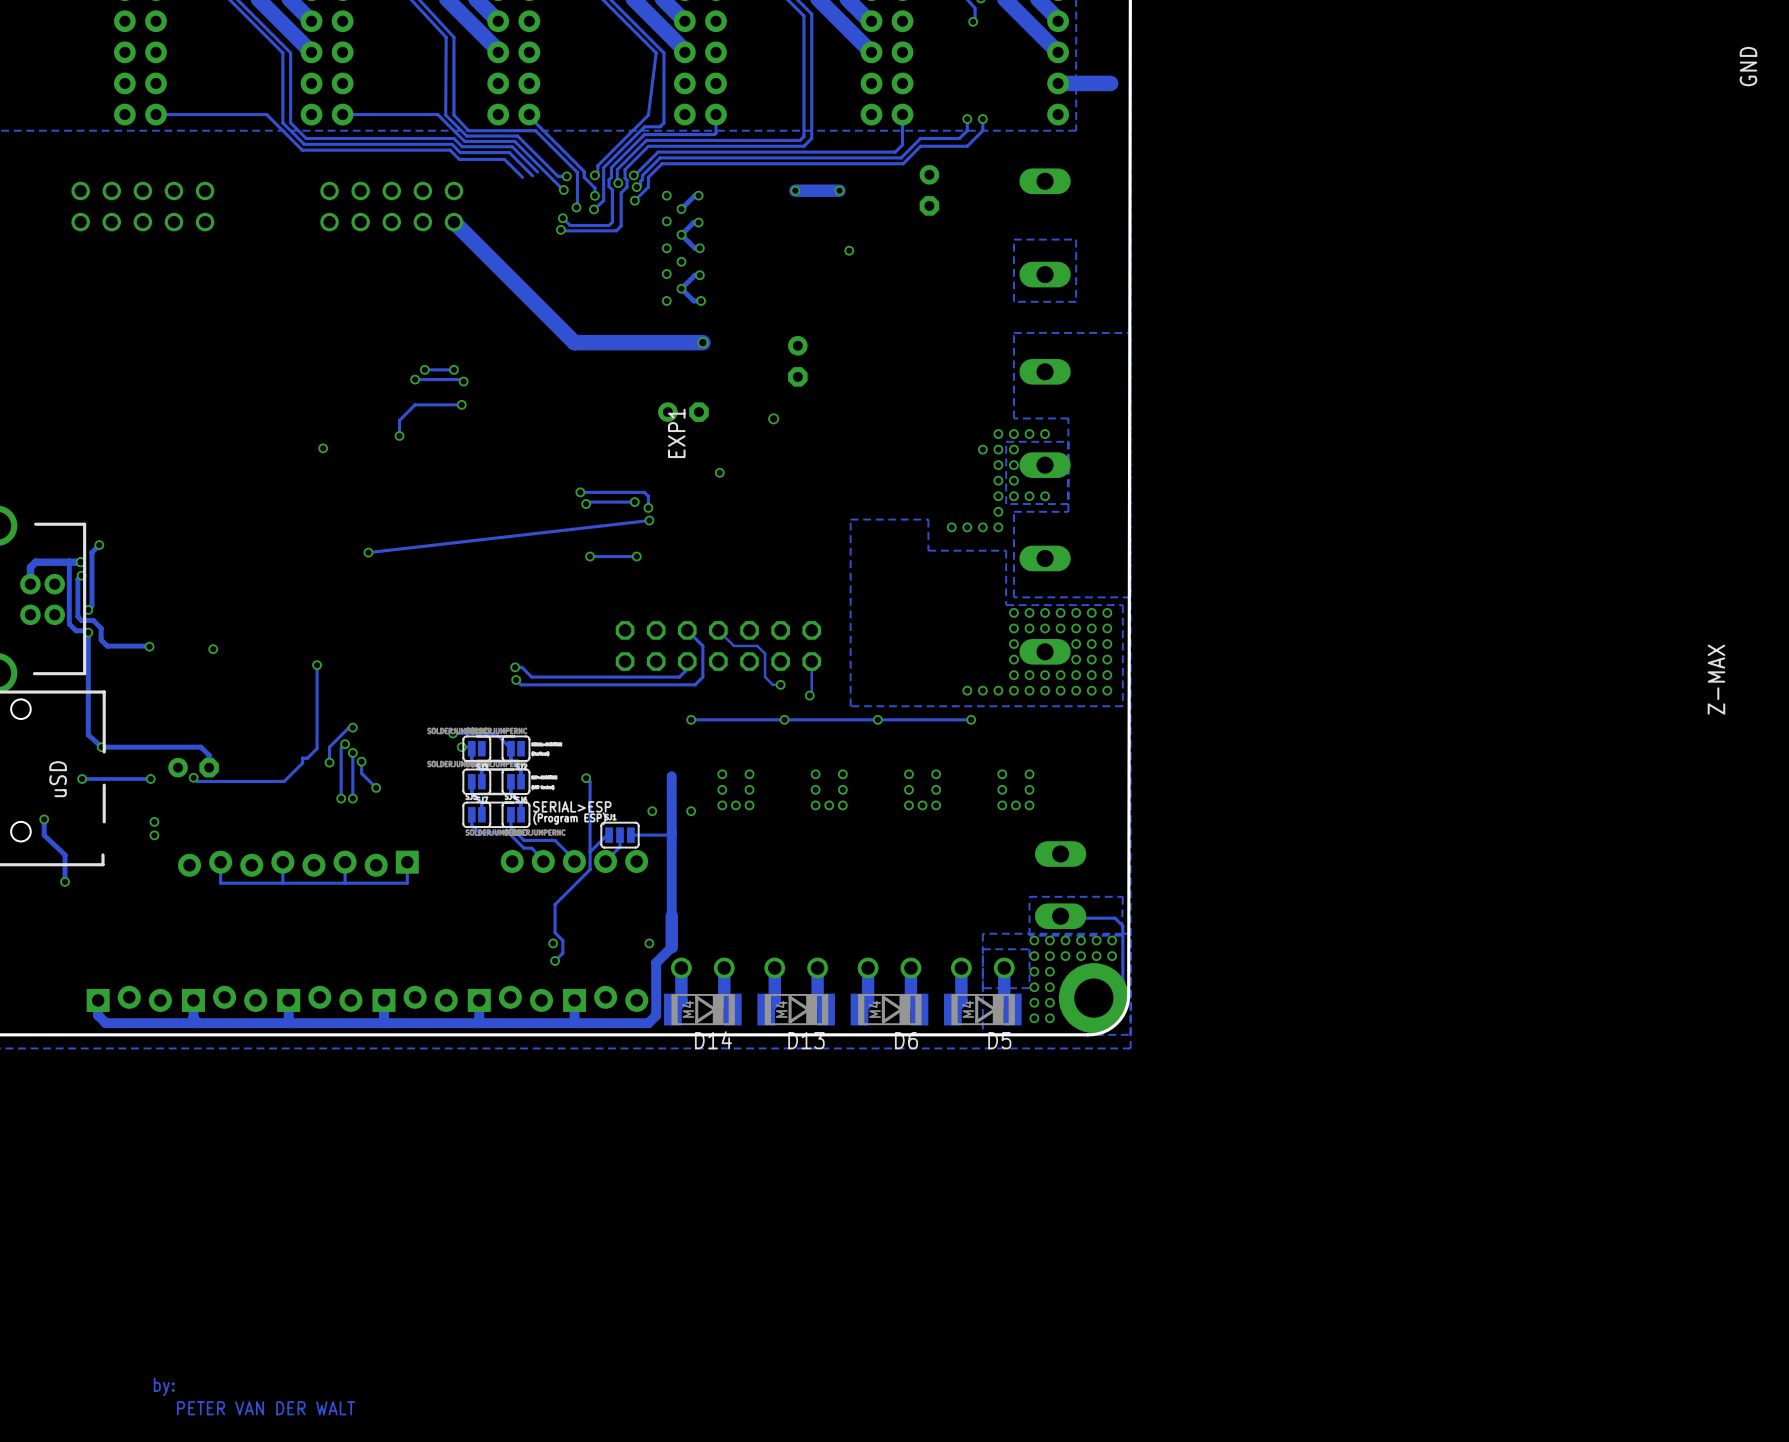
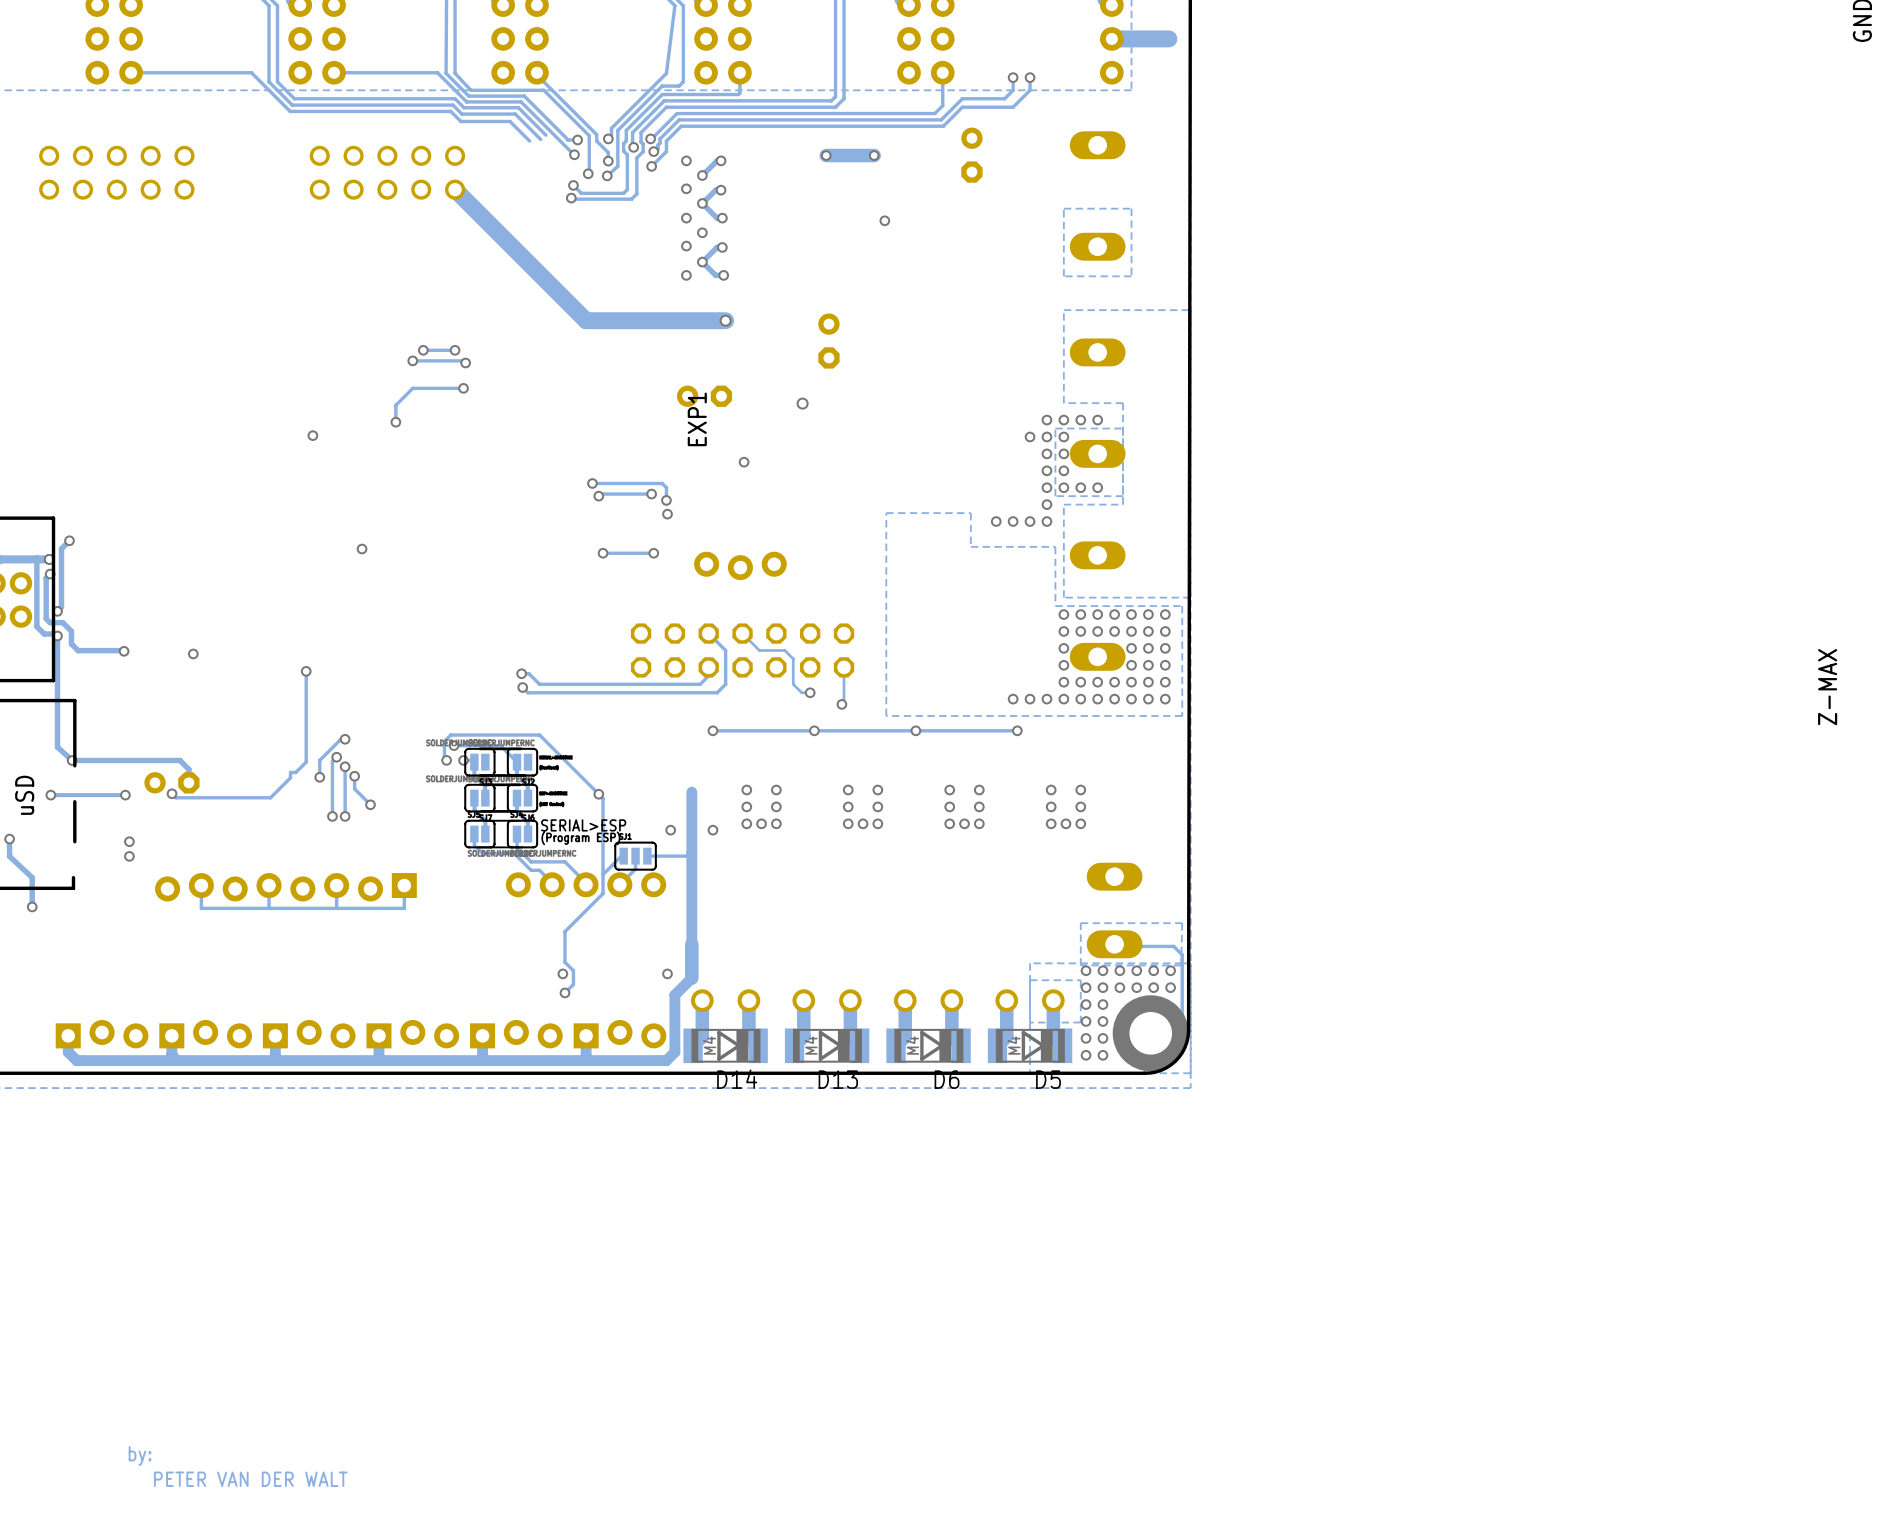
track: (649, 520) (368, 552) -> none
part: none -> (740, 565)
track: none -> (446, 760) (444, 758) (444, 741) (450, 735) (539, 735) (598, 794)
via: none -> (446, 760)

